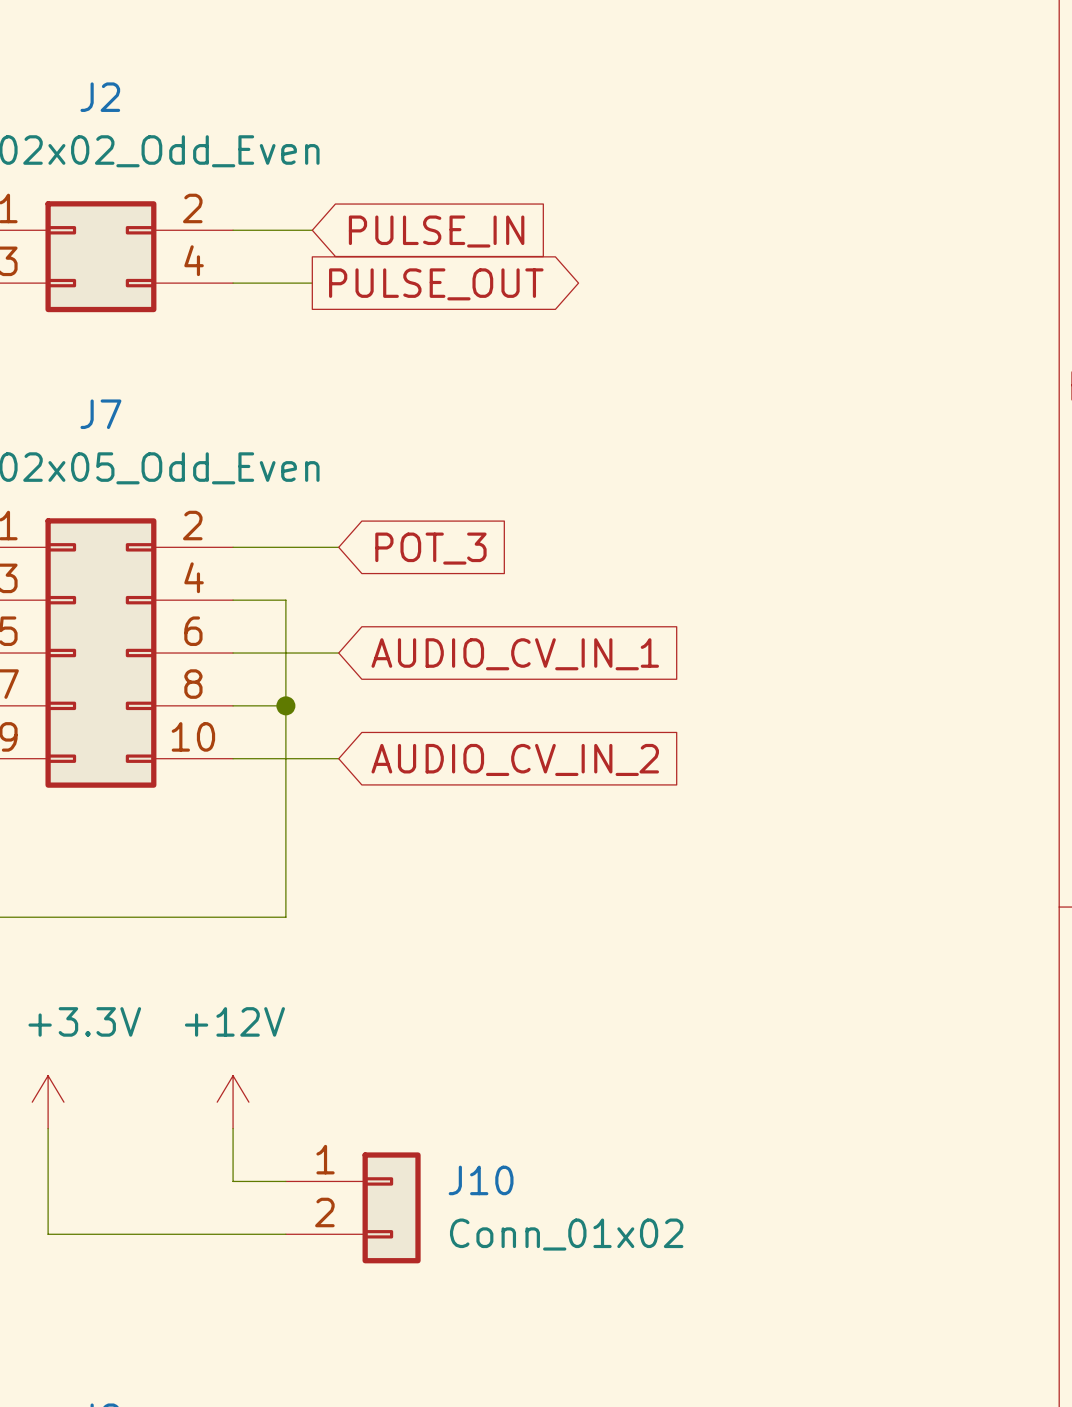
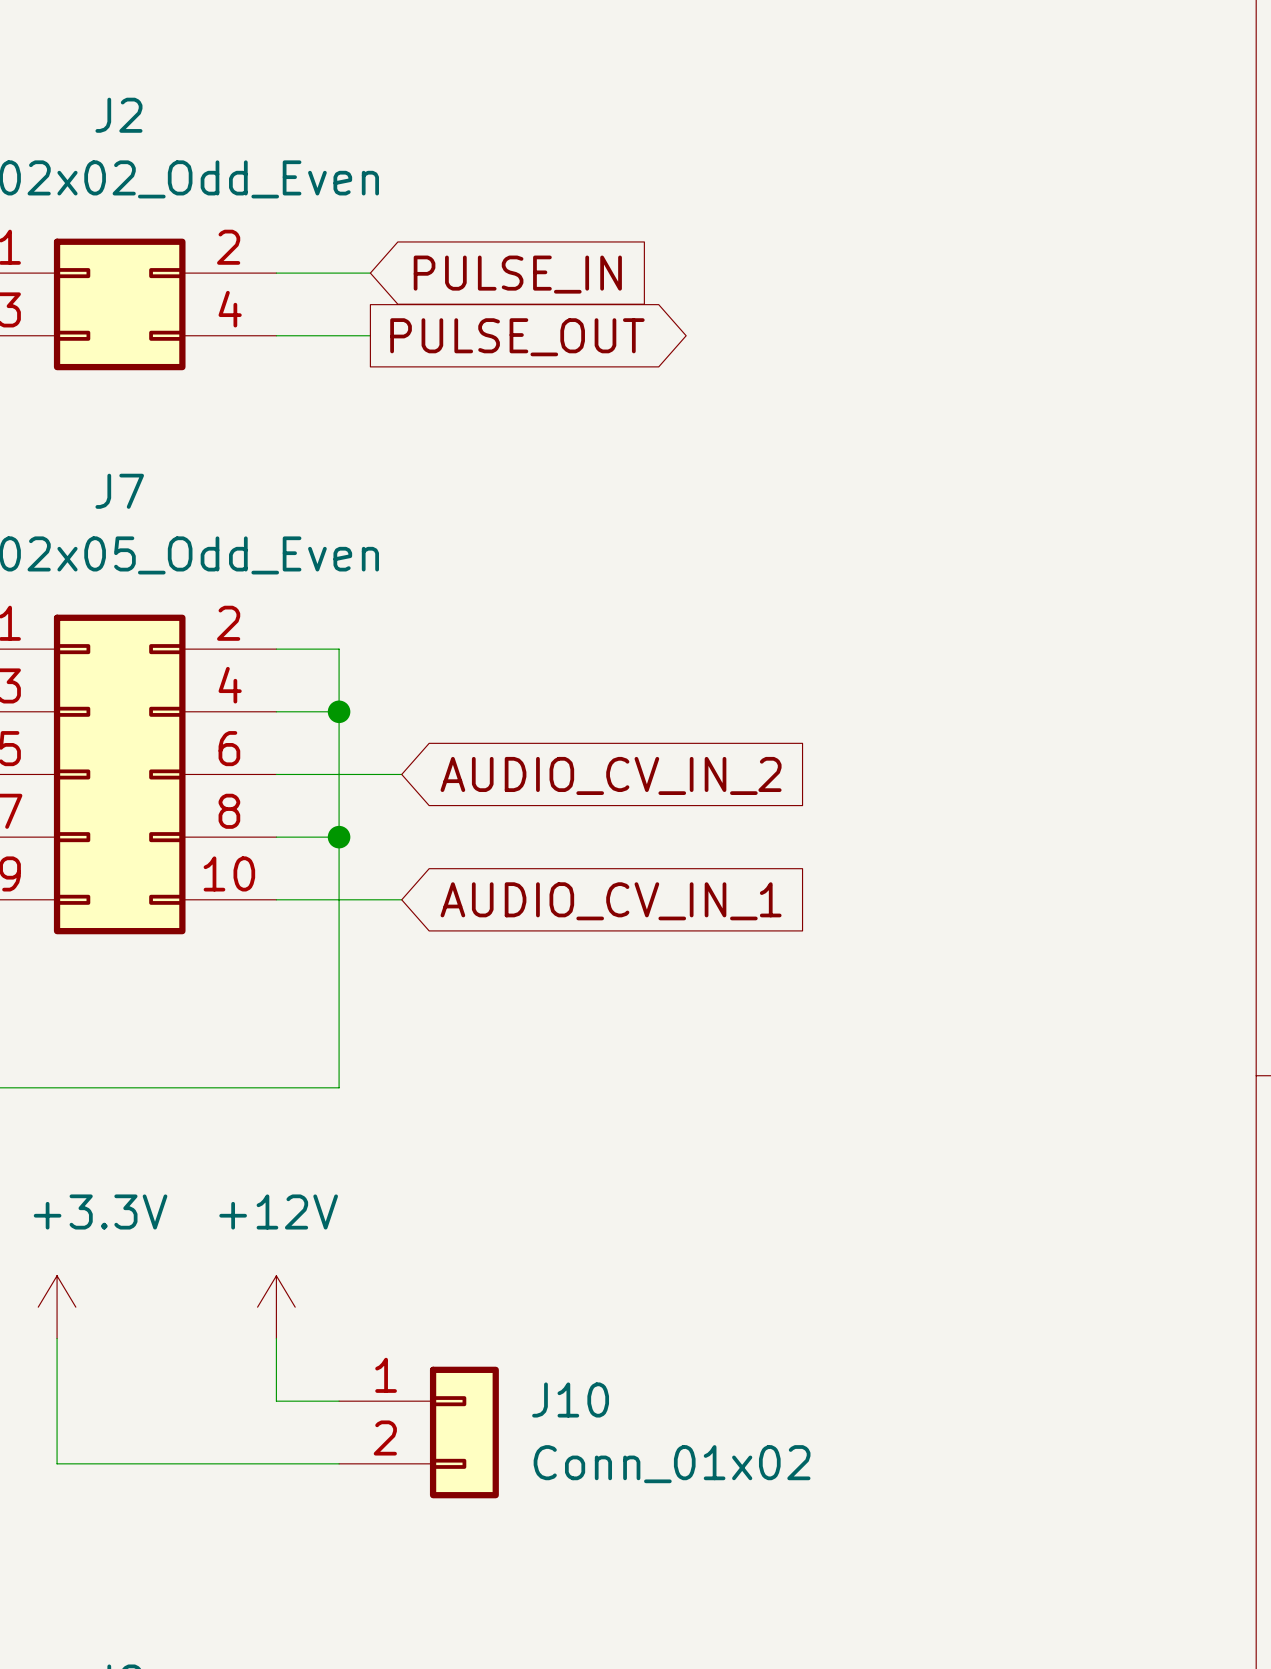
wire: (285, 547) (338, 547) -> (339, 649) (339, 711)
global label: POT_3 (430, 548) -> none
junction: none -> (339, 711)
global label: AUDIO_CV_IN_1 (515, 654) -> AUDIO_CV_IN_2 (611, 775)
global label: AUDIO_CV_IN_2 (515, 759) -> AUDIO_CV_IN_1 (611, 901)

